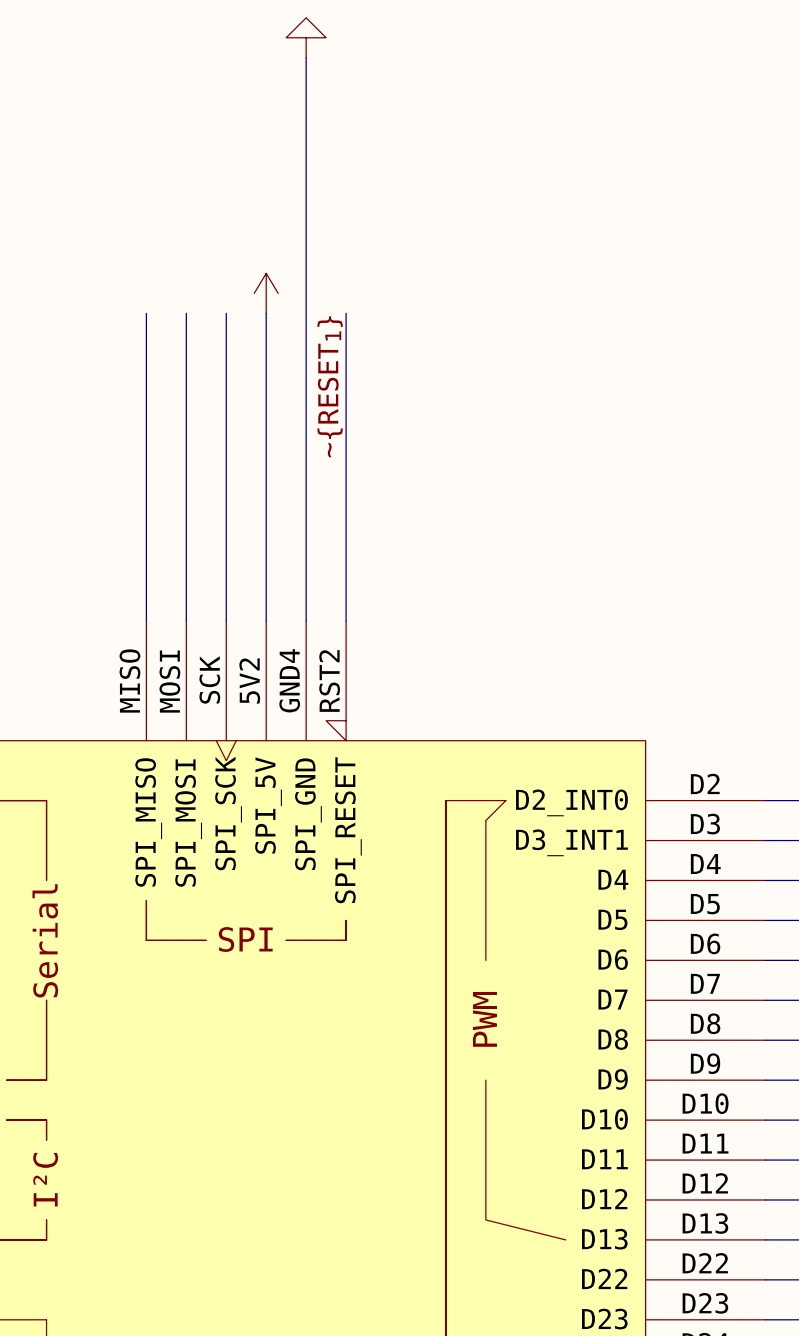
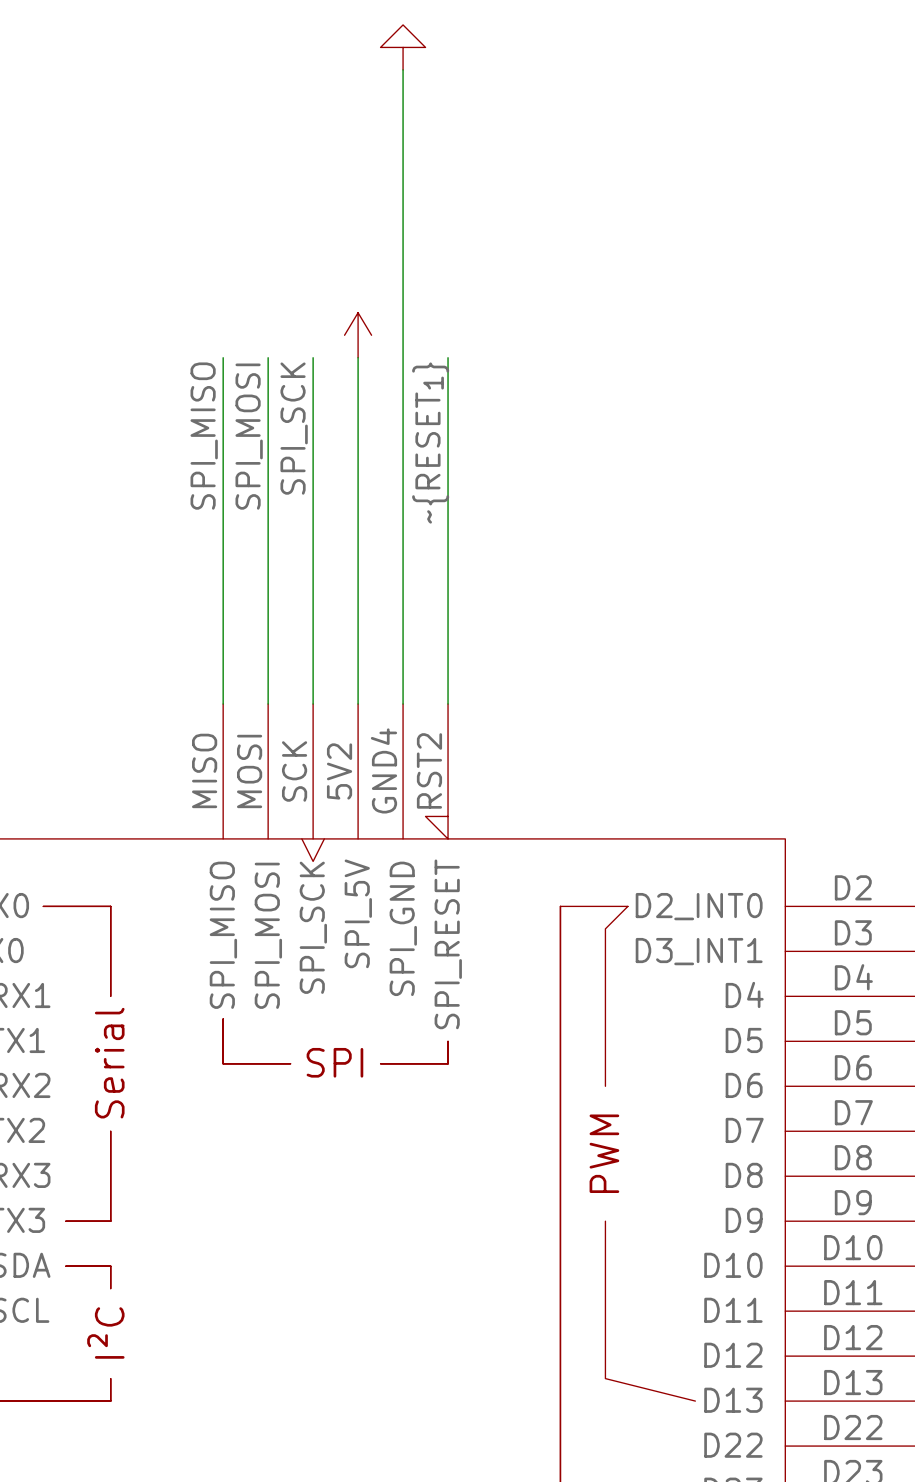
label: none -> SPI_SCK (294, 428)
label: none -> SPI_MISO (204, 436)
label: none -> SPI_MOSI (249, 436)

